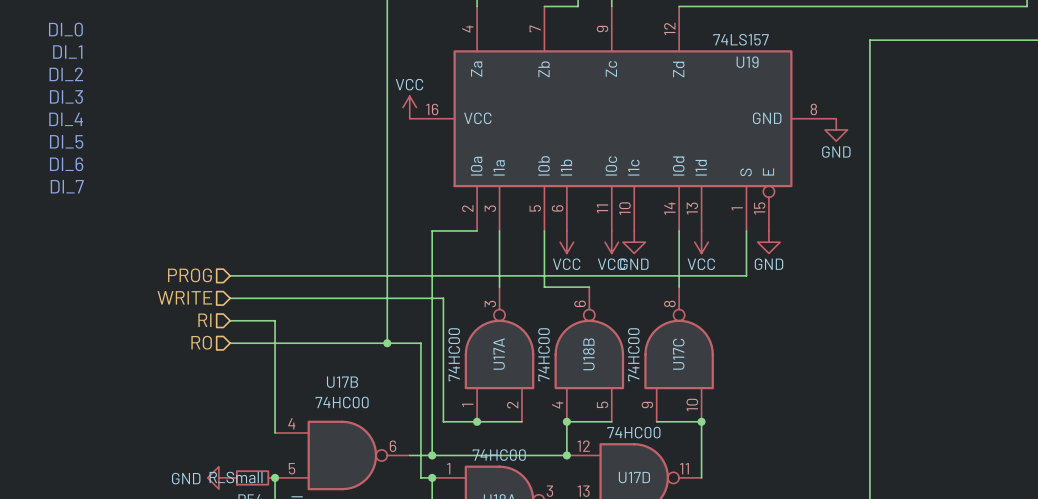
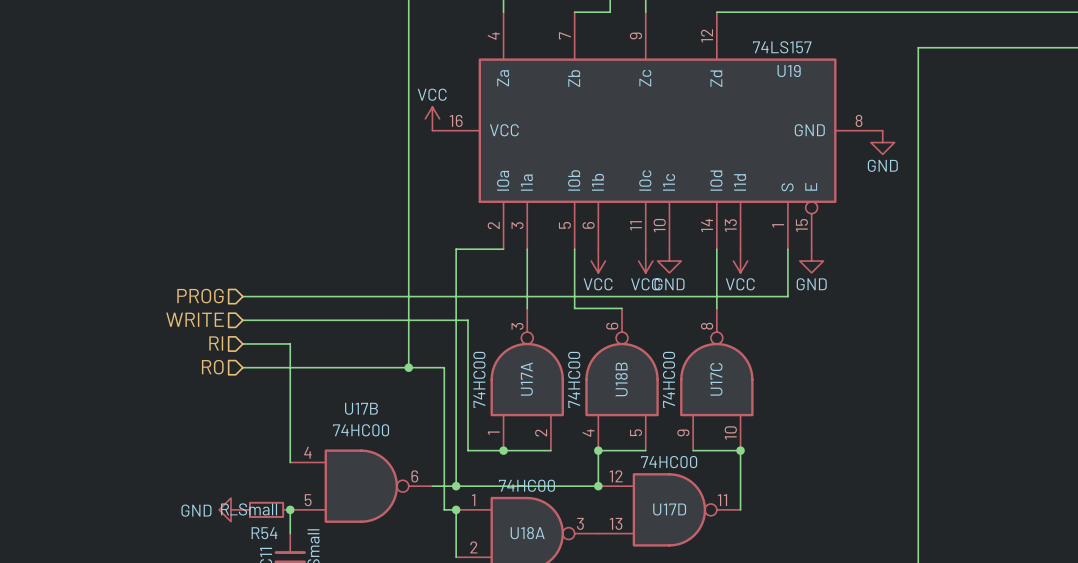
text: DI_0 (65, 29) -> none
text: DI_1 (67, 52) -> none
text: DI_2 (66, 74) -> none
text: DI_3 (66, 96) -> none
text: DI_4 (66, 119) -> none
text: DI_5 (66, 141) -> none
text: DI_6 (66, 164) -> none
text: DI_7 (67, 186) -> none

